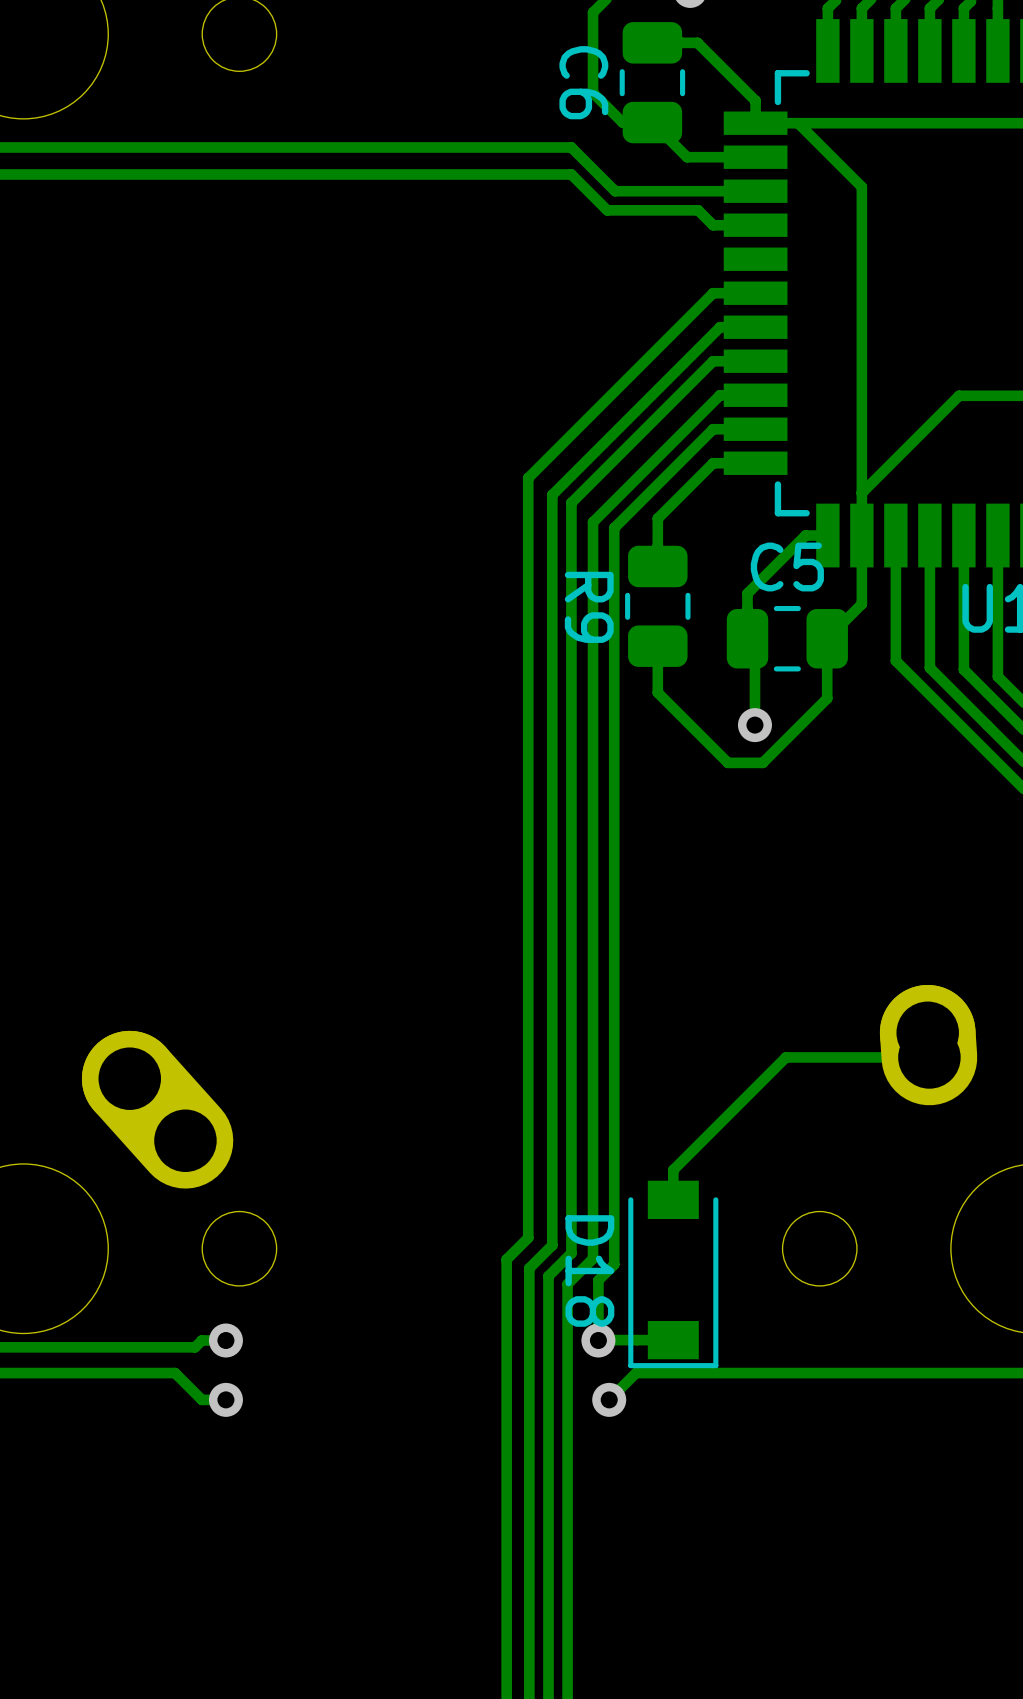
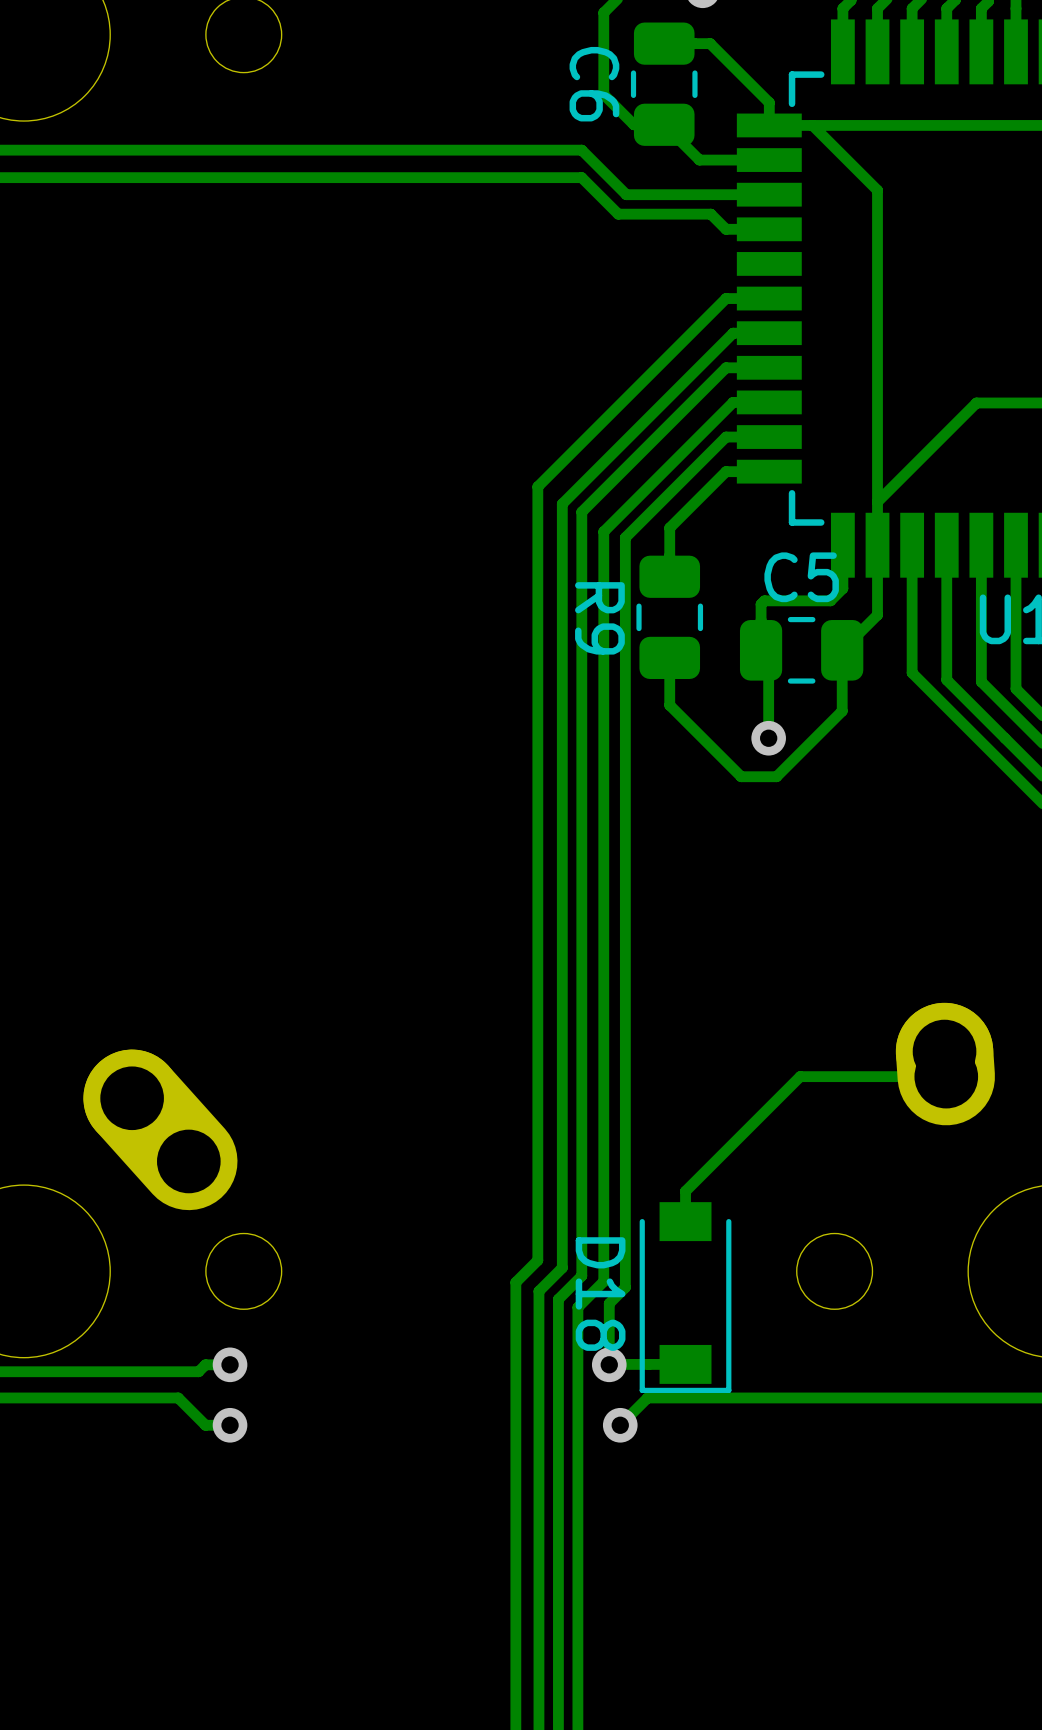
track: (827, 535) (805, 535) (750, 590) -> (842, 545) (842, 588) (830, 600) (764, 600)

